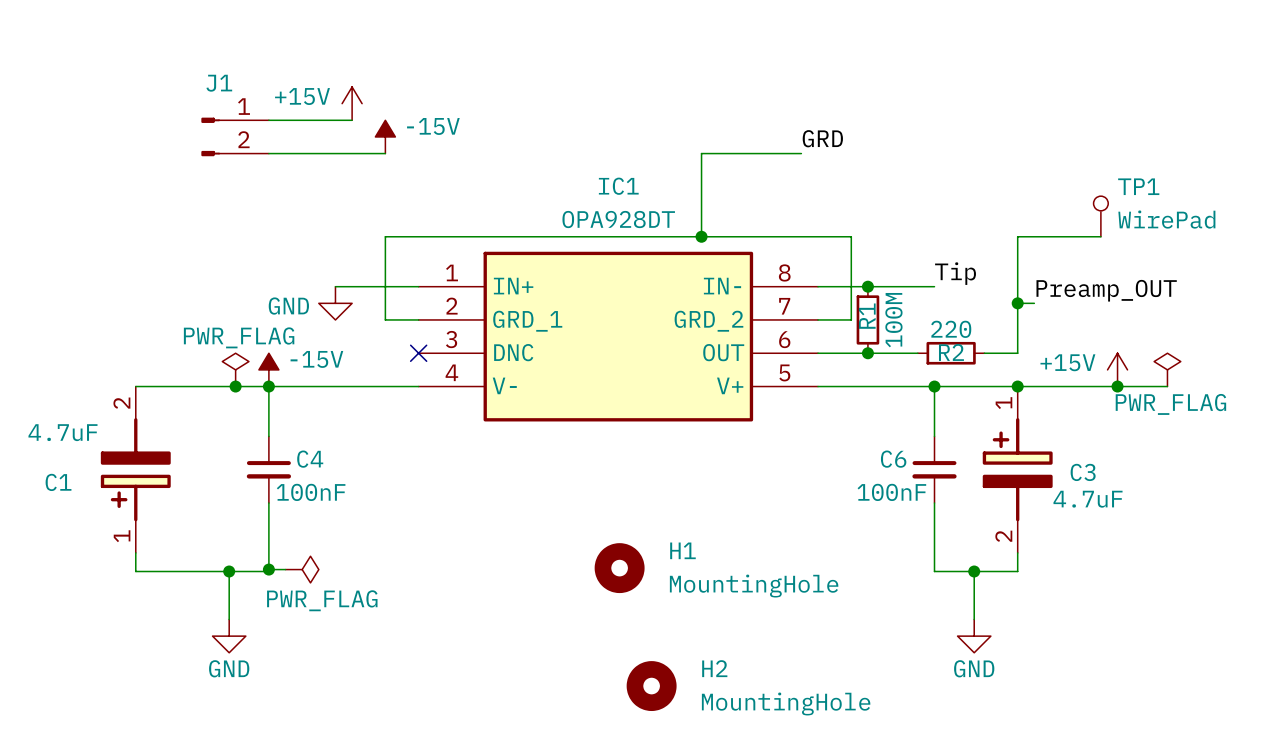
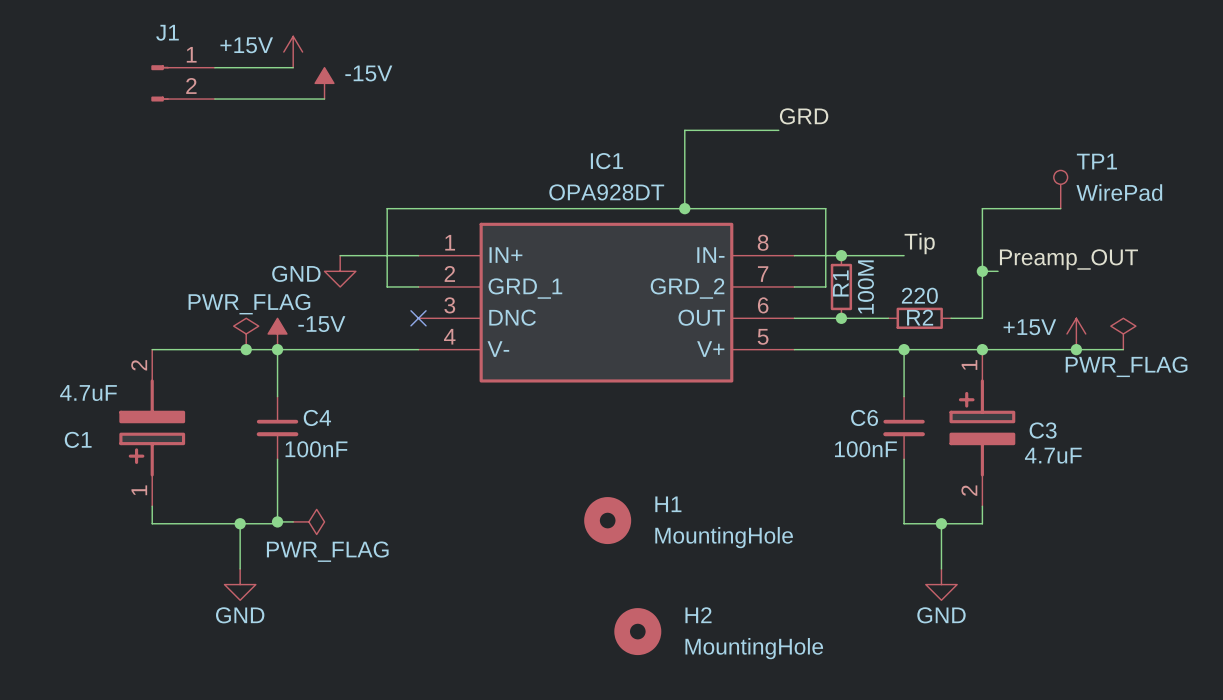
wire: none -> (214, 67) (293, 67)
power symbol position: +15V (352, 103) -> +15V (293, 52)
wire: (318, 120) (352, 120) -> none
J1 position: (235, 136) -> (183, 83)
power symbol position: -15V (385, 136) -> -15V (324, 83)
wire: (268, 153) (385, 153) -> none

